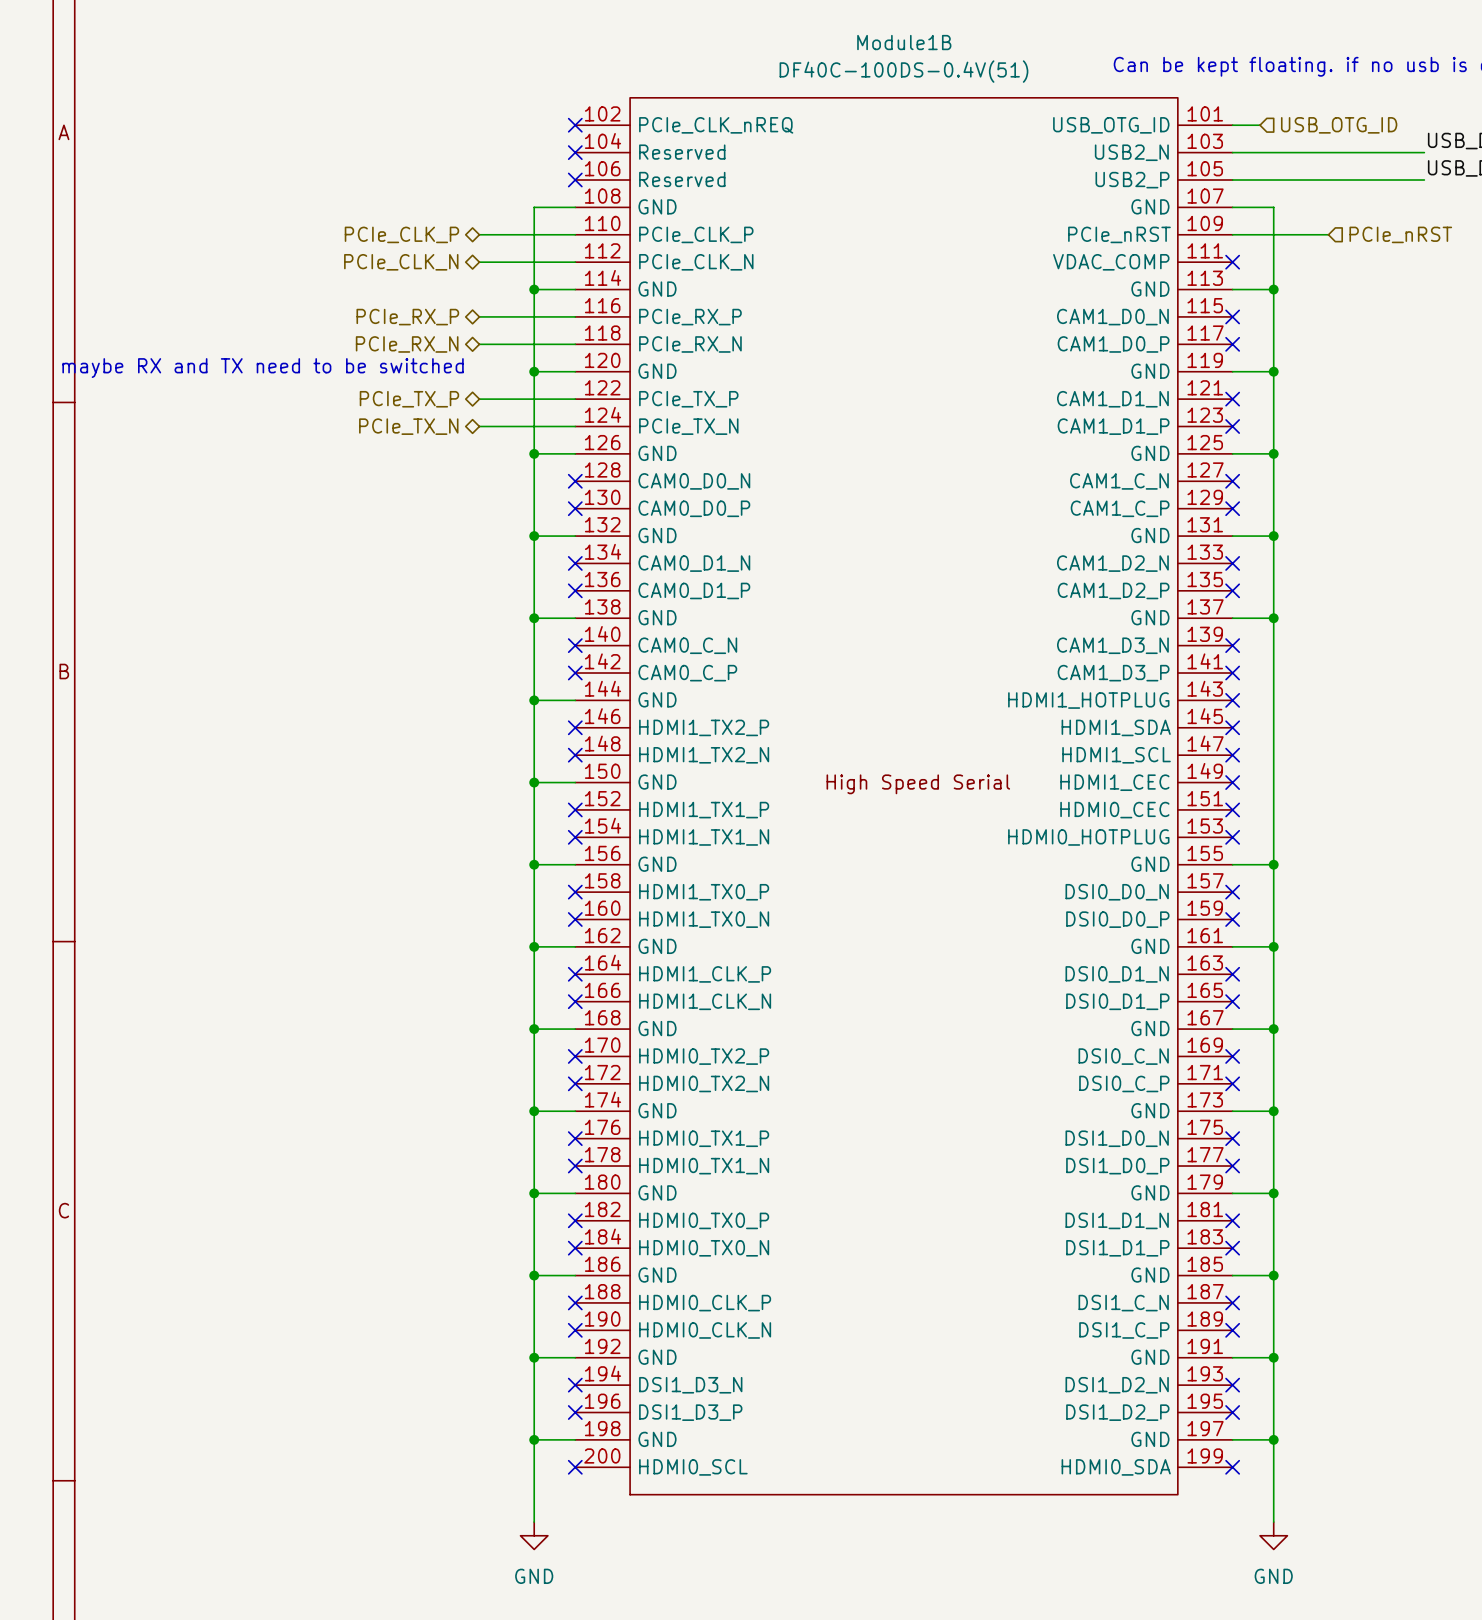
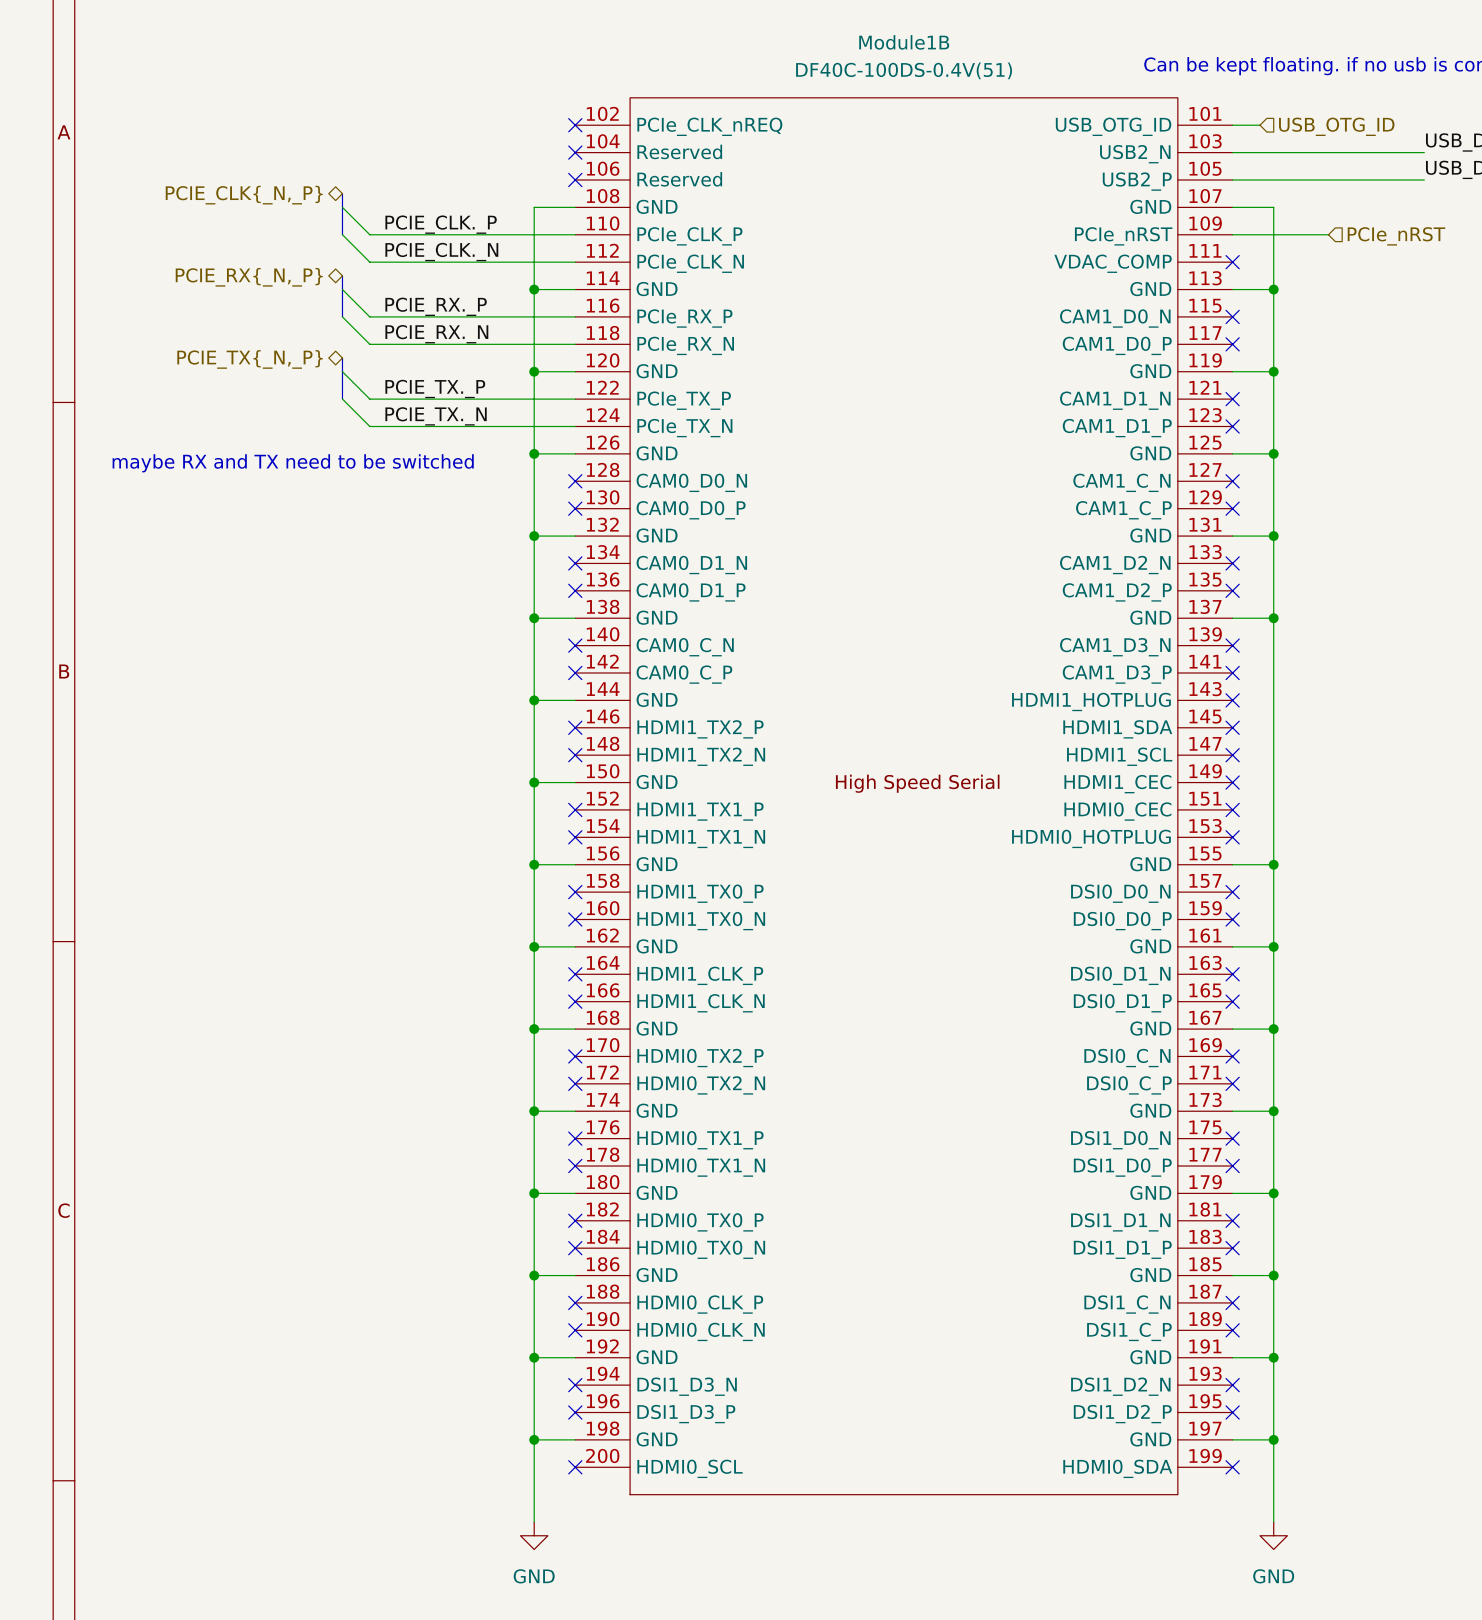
bus: none -> (342, 193) (342, 234)
hierarchical label: none -> PCIE_CLK{_N,_P} (244, 195)
wire: none -> (342, 207) (369, 234) (479, 234)
label: none -> PCIE_CLK._P (441, 224)
wire: none -> (342, 234) (369, 262) (479, 262)
hierarchical label: PCIe_CLK_P (401, 234) -> none
label: none -> PCIE_CLK._N (441, 252)
hierarchical label: PCIe_CLK_N (401, 262) -> none
bus: none -> (342, 275) (342, 316)
hierarchical label: none -> PCIE_RX{_N,_P} (249, 277)
wire: none -> (342, 289) (369, 316) (479, 316)
label: none -> PCIE_RX._P (436, 306)
wire: none -> (342, 316) (369, 344) (479, 344)
hierarchical label: PCIe_RX_P (407, 317) -> none
label: none -> PCIE_RX._N (436, 334)
hierarchical label: PCIe_RX_N (407, 344) -> none
bus: none -> (342, 358) (342, 399)
hierarchical label: none -> PCIE_TX{_N,_P} (250, 359)
text position: maybe RX and TX need to be switched (263, 368) -> maybe RX and TX need to be switched (293, 463)
wire: none -> (342, 371) (369, 399) (479, 399)
label: none -> PCIE_TX._P (435, 388)
wire: none -> (342, 399) (369, 426) (479, 426)
hierarchical label: PCIe_TX_P (409, 399) -> none
label: none -> PCIE_TX._N (436, 416)
hierarchical label: PCIe_TX_N (408, 426) -> none

